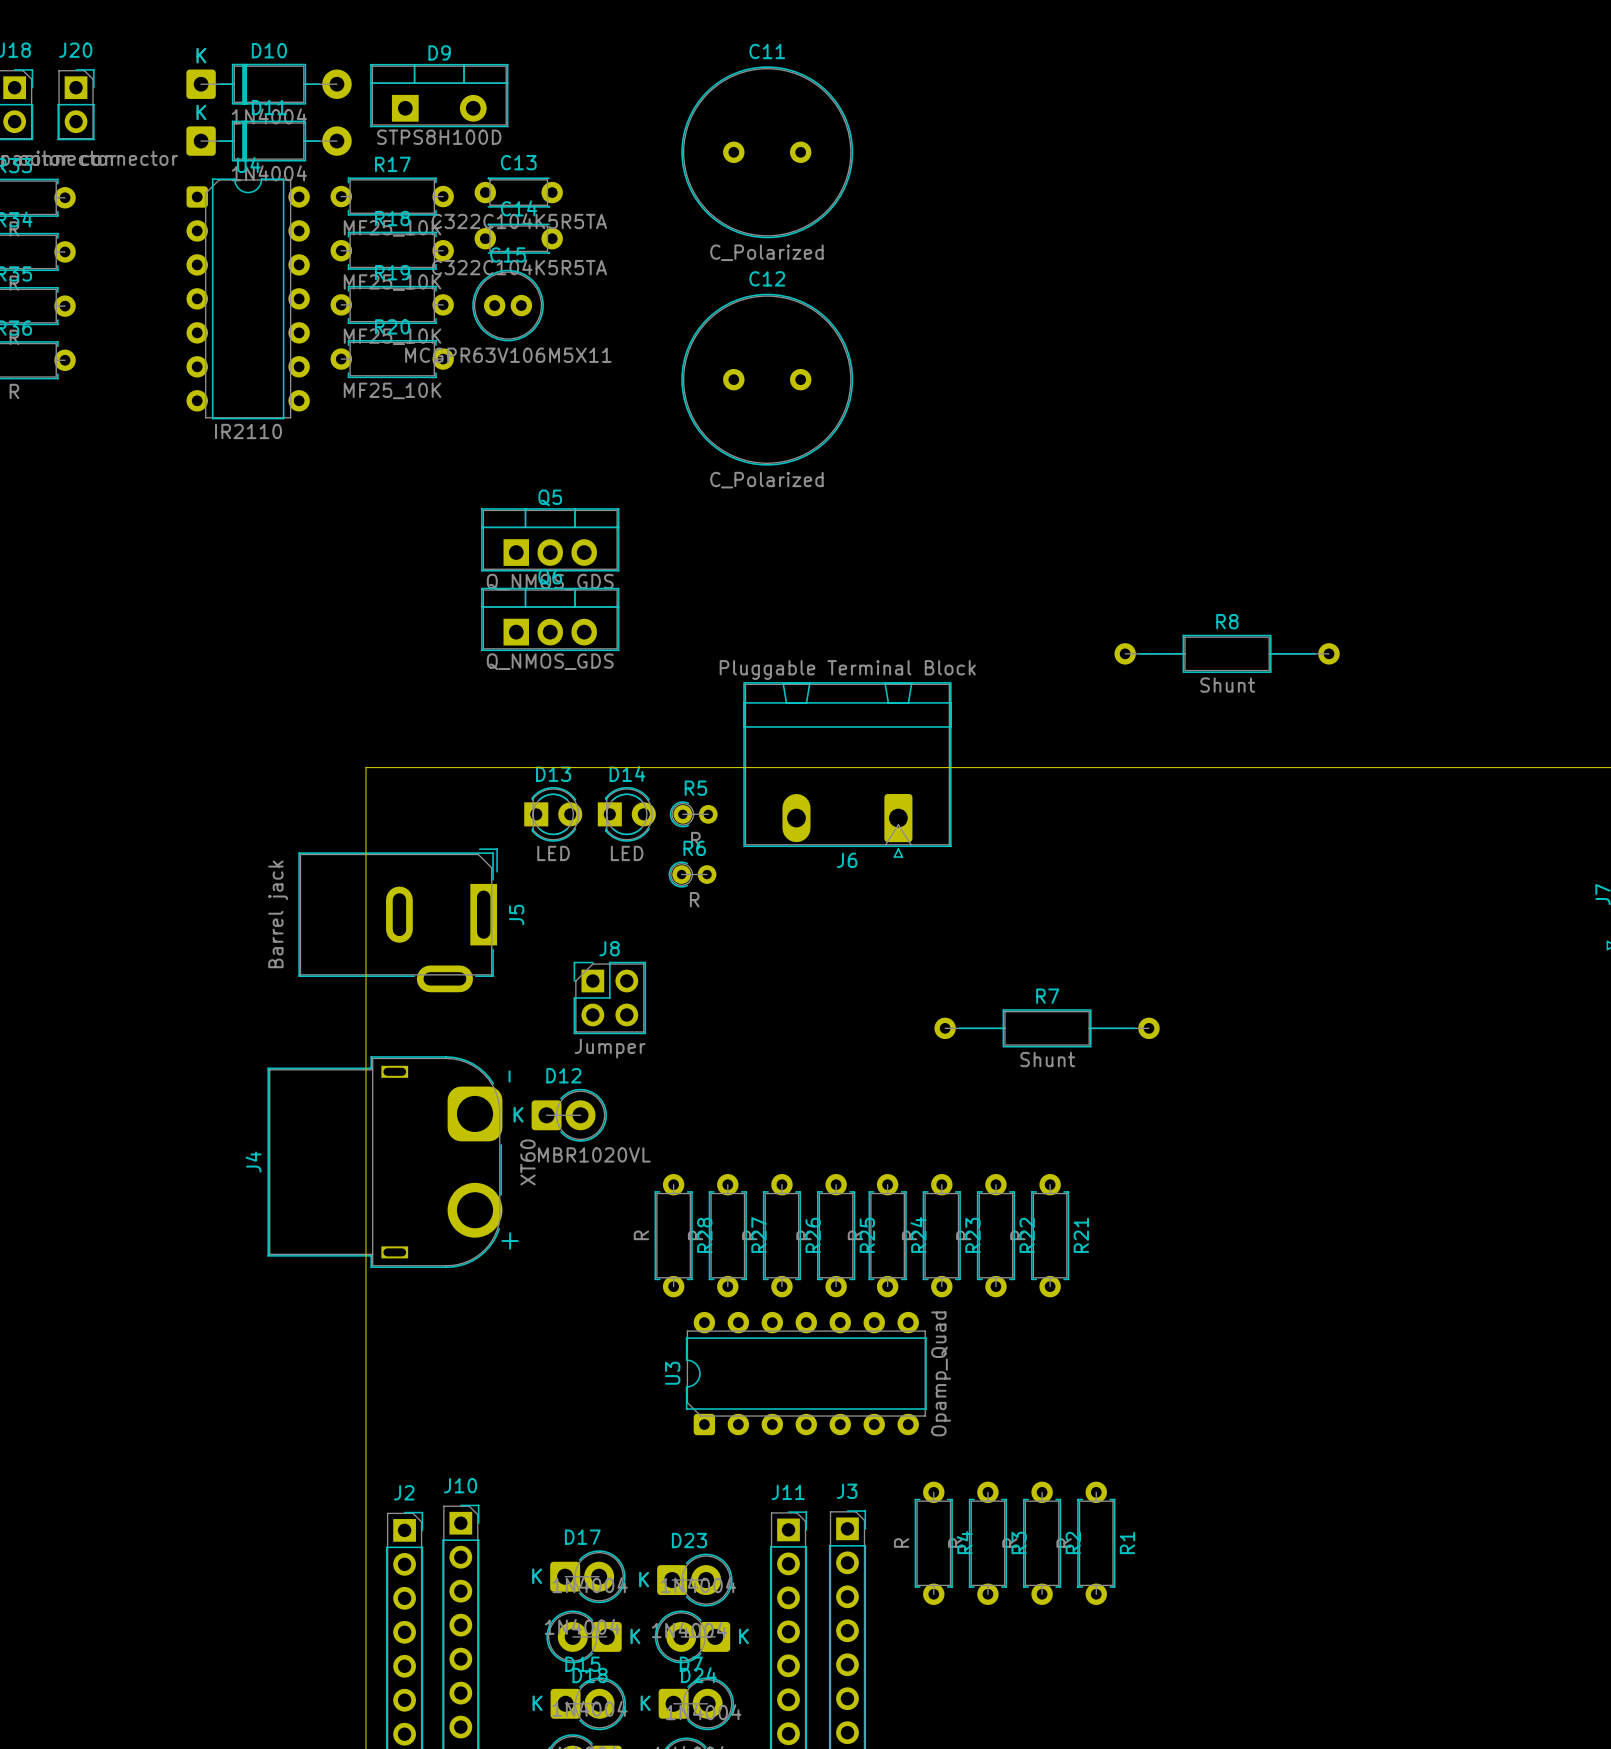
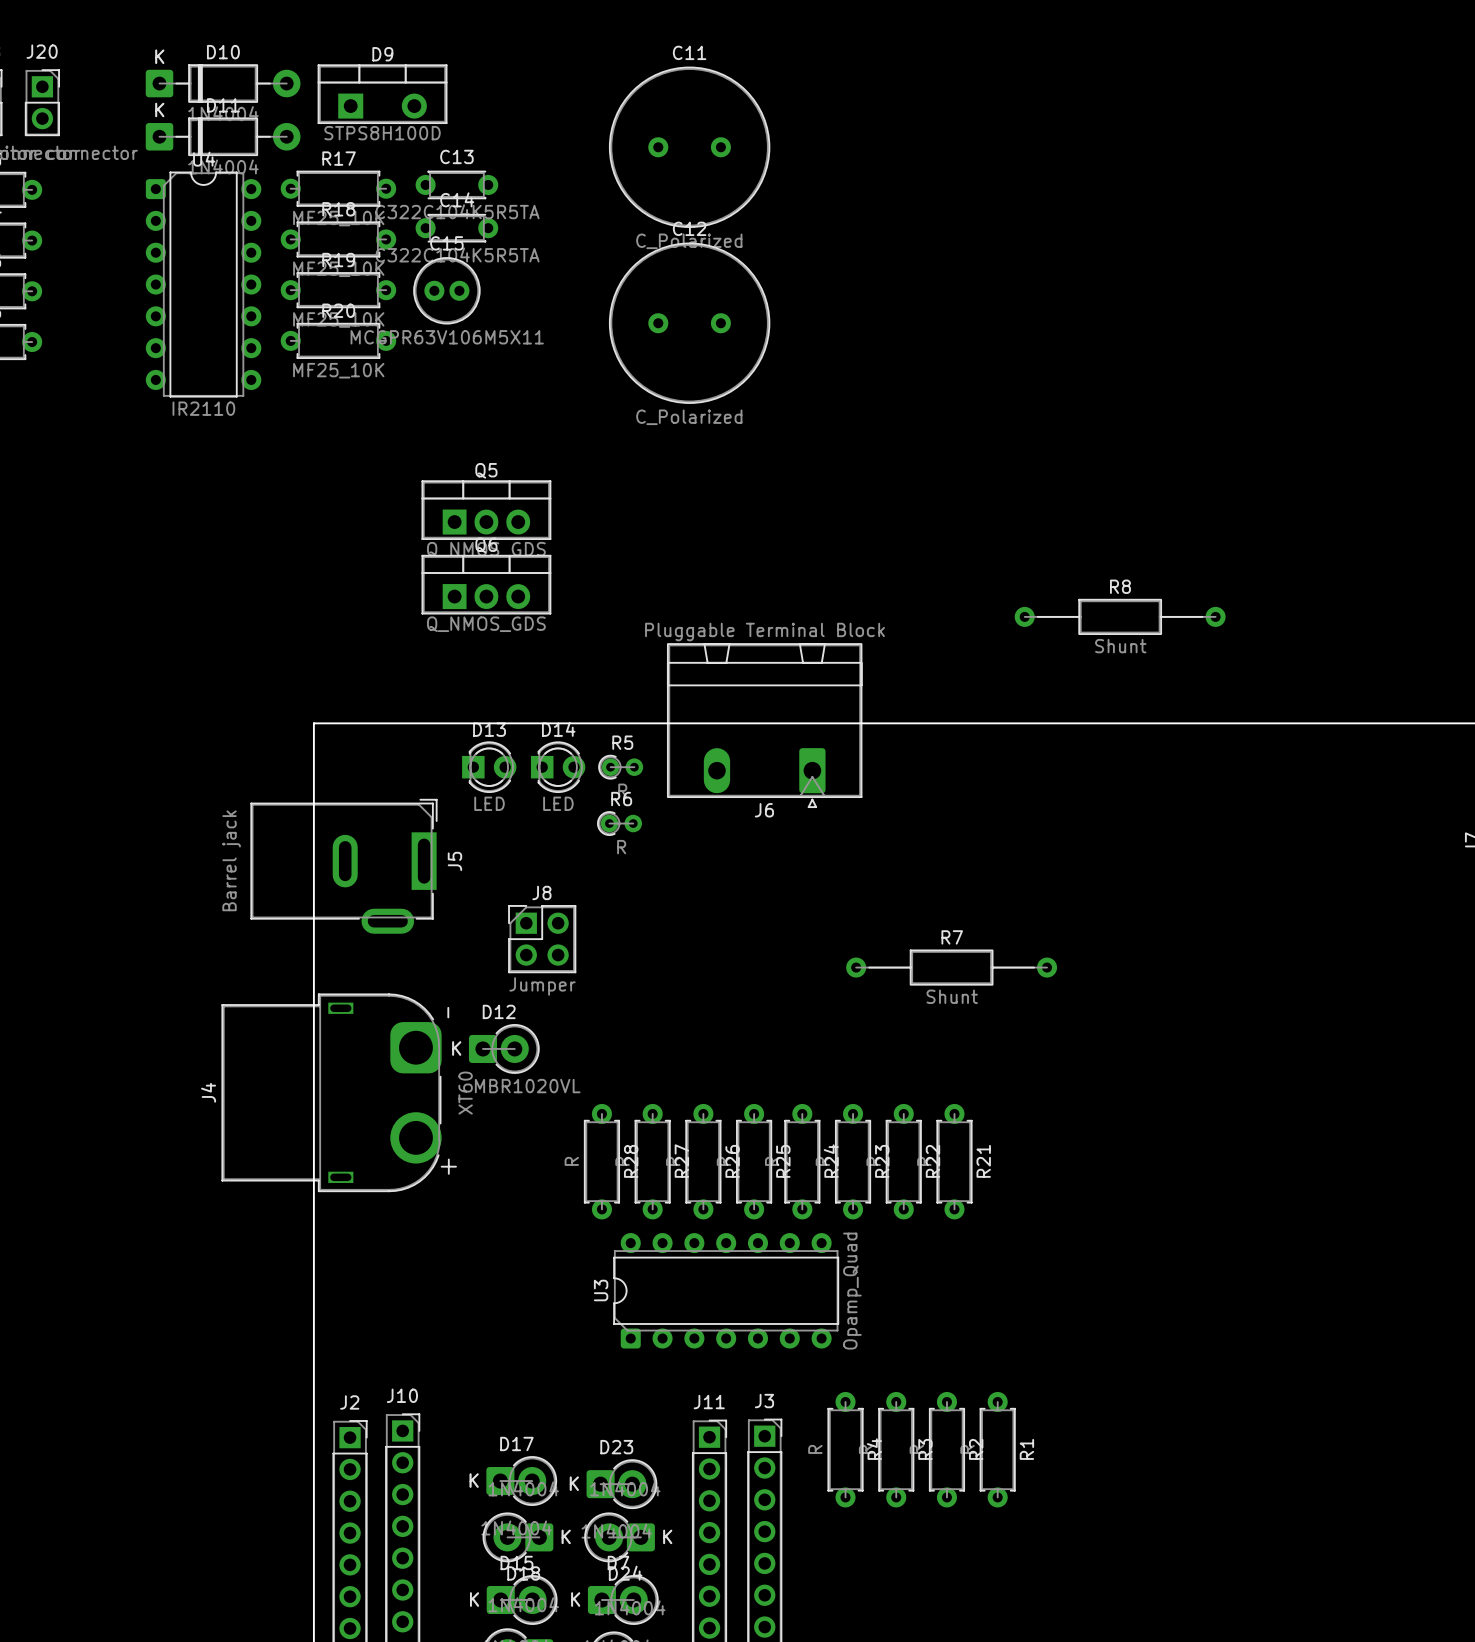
C12 position: (767, 379) -> (689, 323)

